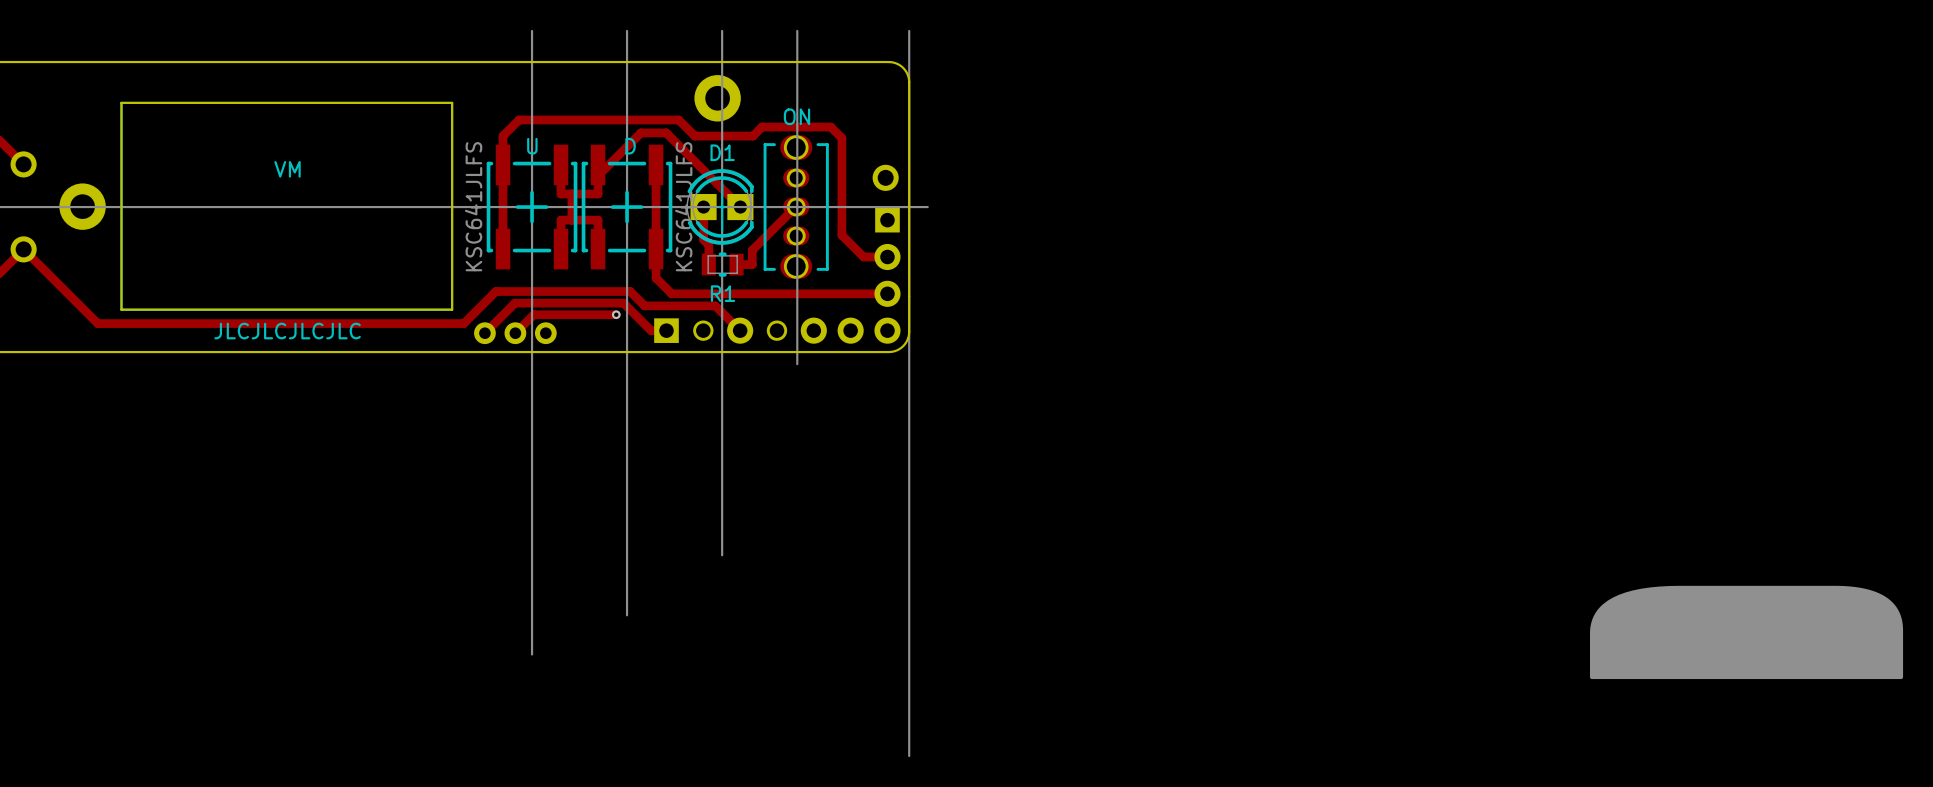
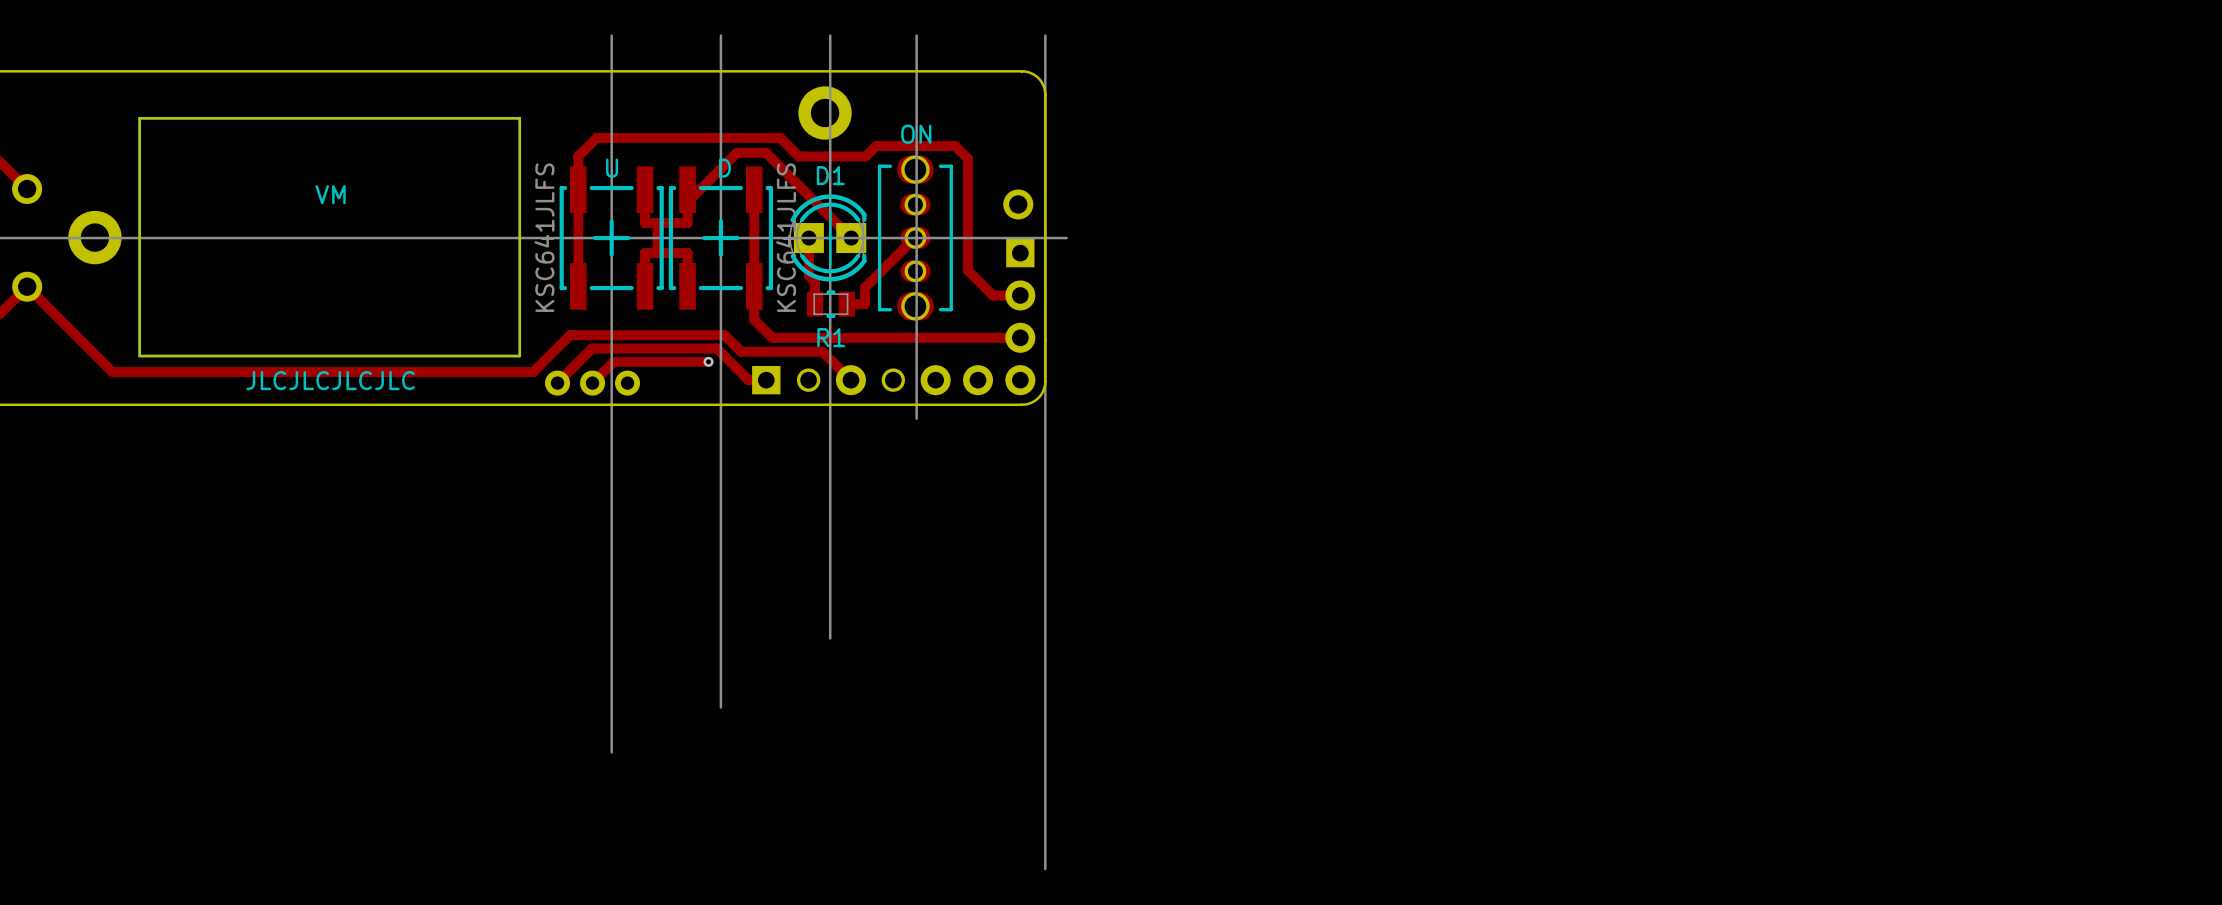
drawing: [1589, 585, 1904, 680] -> none

